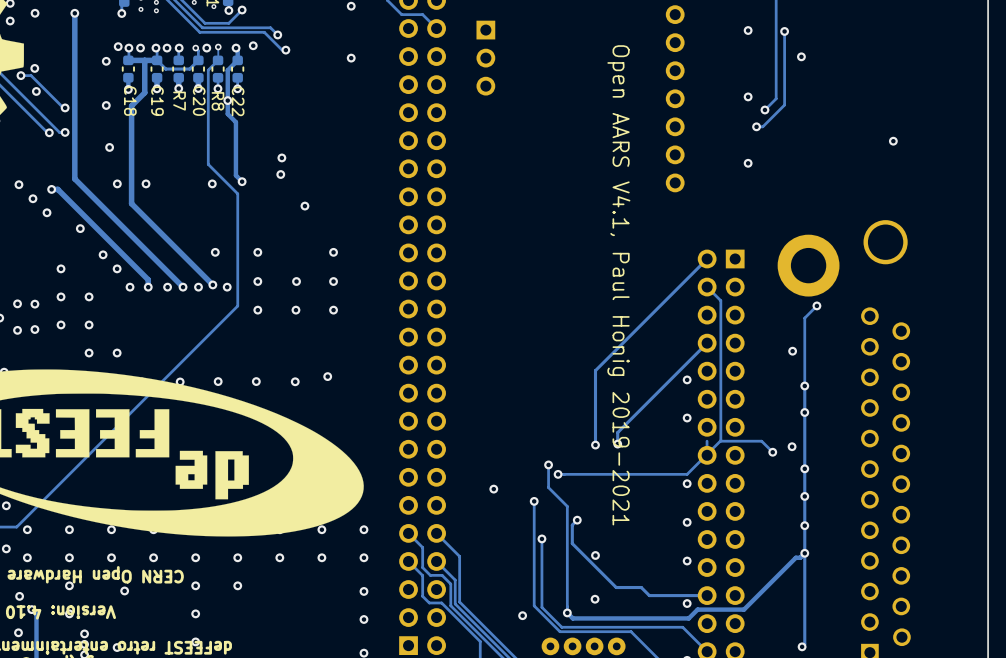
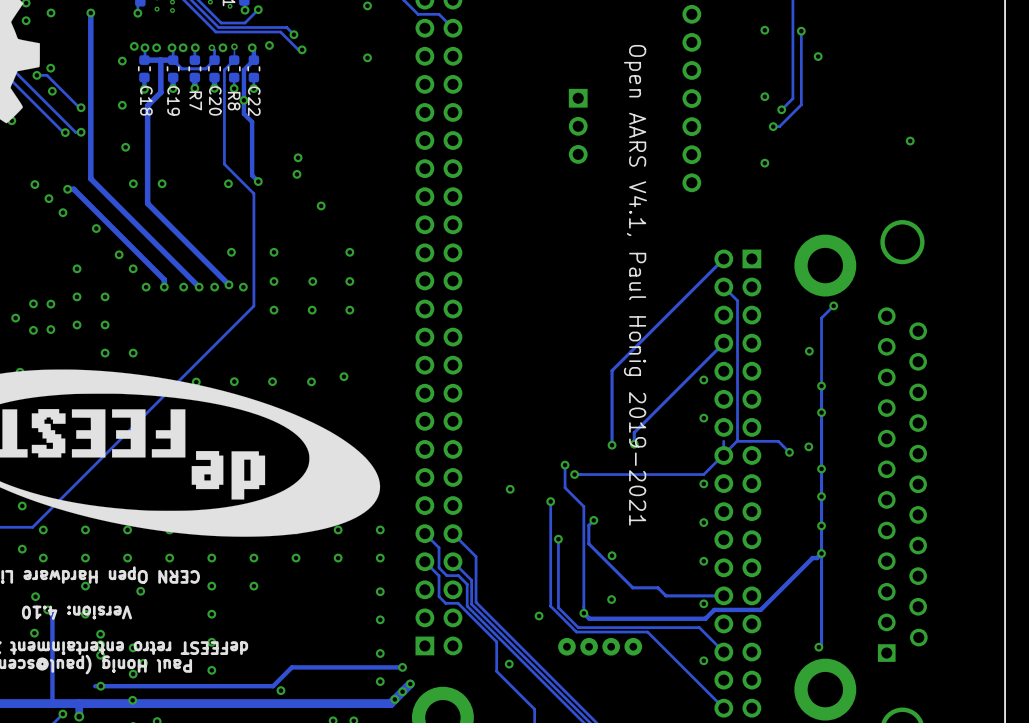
part position: (485, 58) -> (578, 126)

